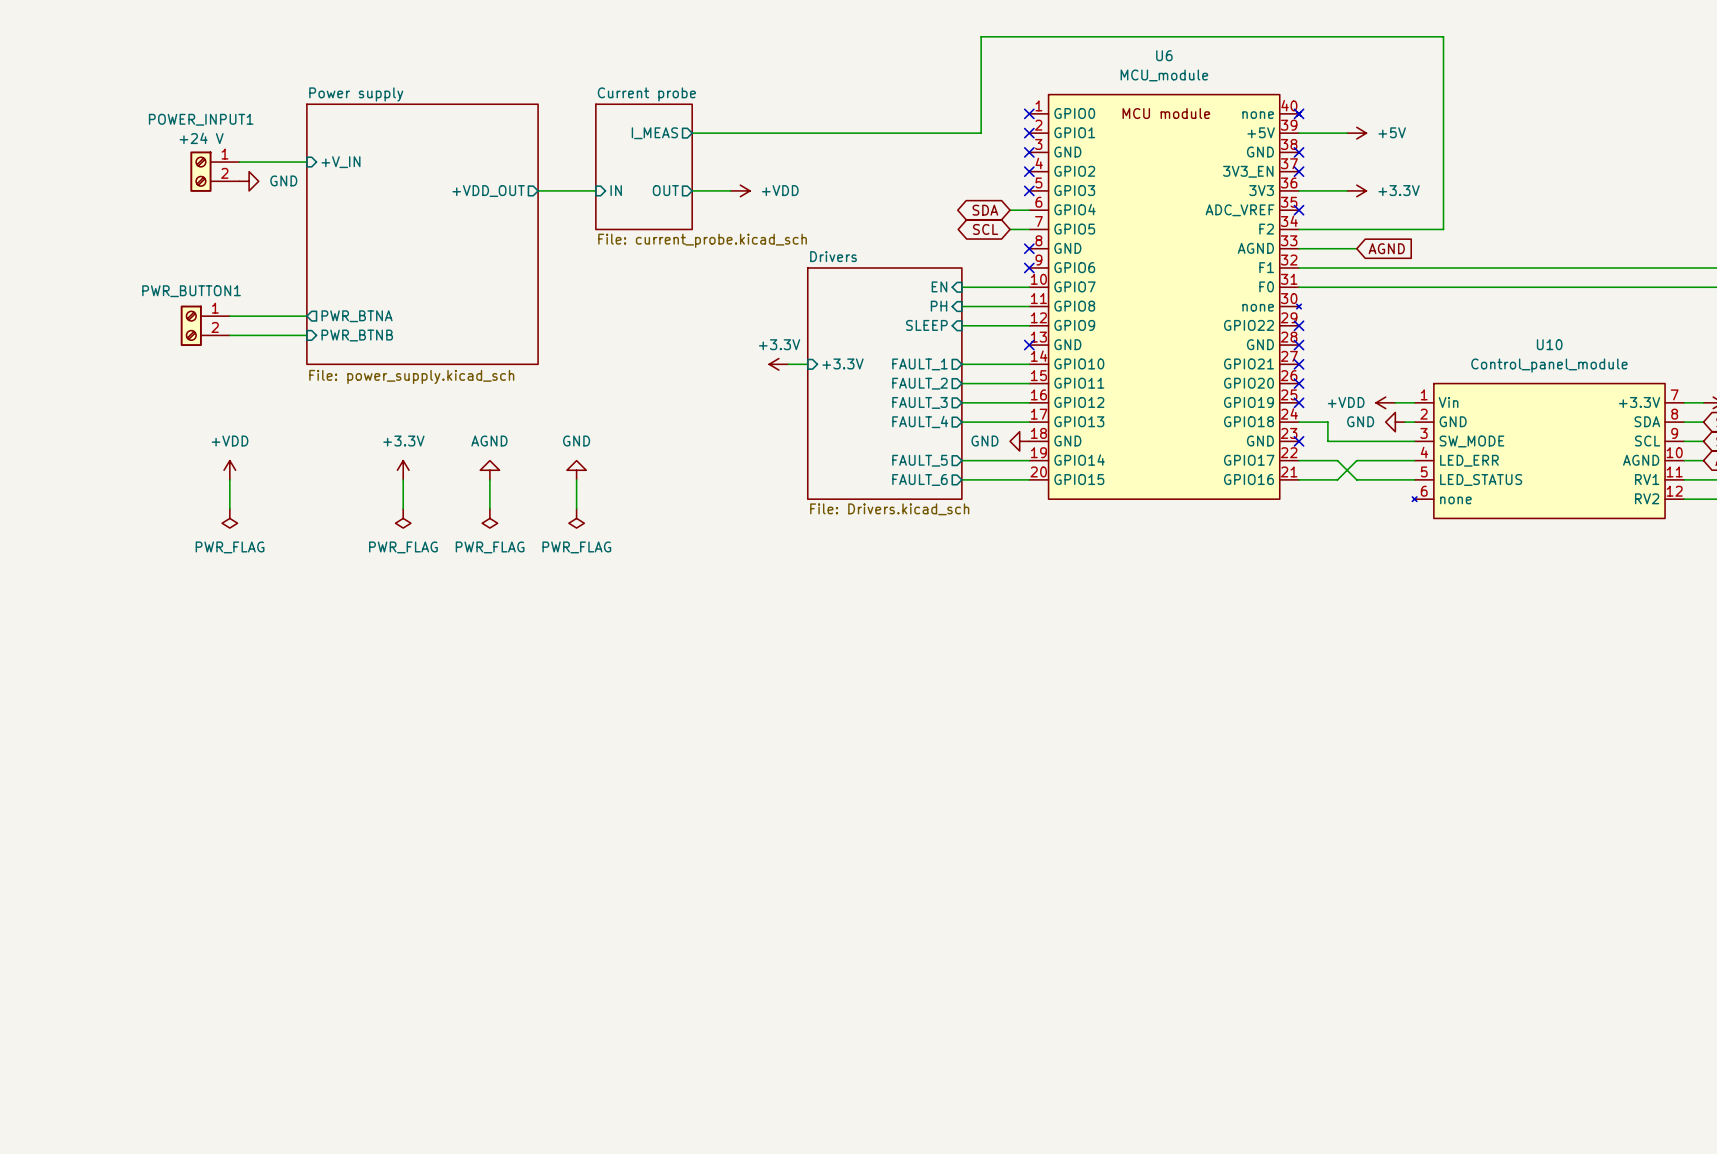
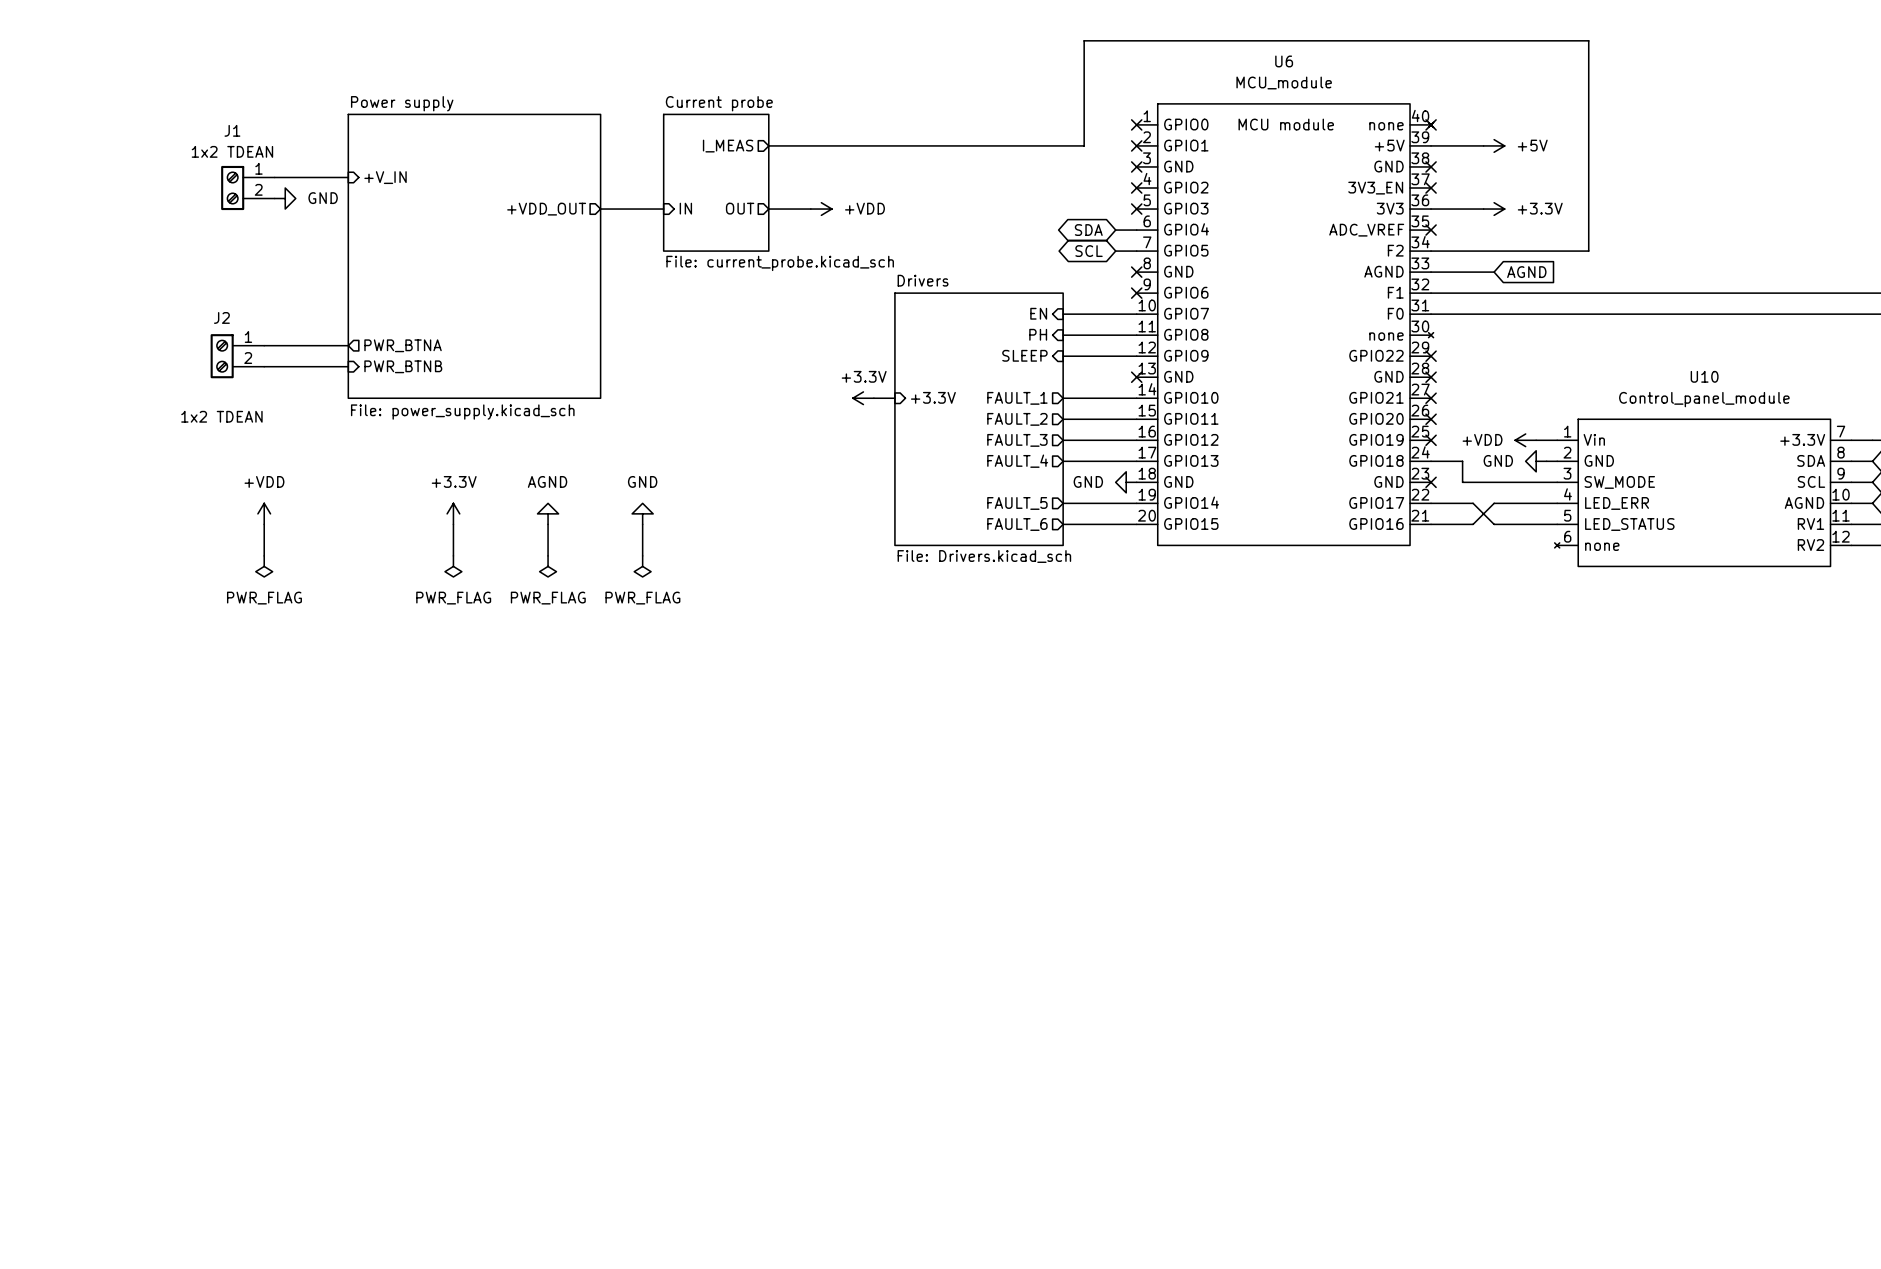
POWER_INPUT1 name: POWER_INPUT1 (201, 119) -> J1 (232, 130)
POWER_INPUT1 value: +24 V (201, 138) -> 1x2 TDEAN (232, 151)
PWR_BUTTON1 name: PWR_BUTTON1 (191, 291) -> J2 (221, 317)
PWR_BUTTON1 value: none -> 1x2 TDEAN (221, 416)

